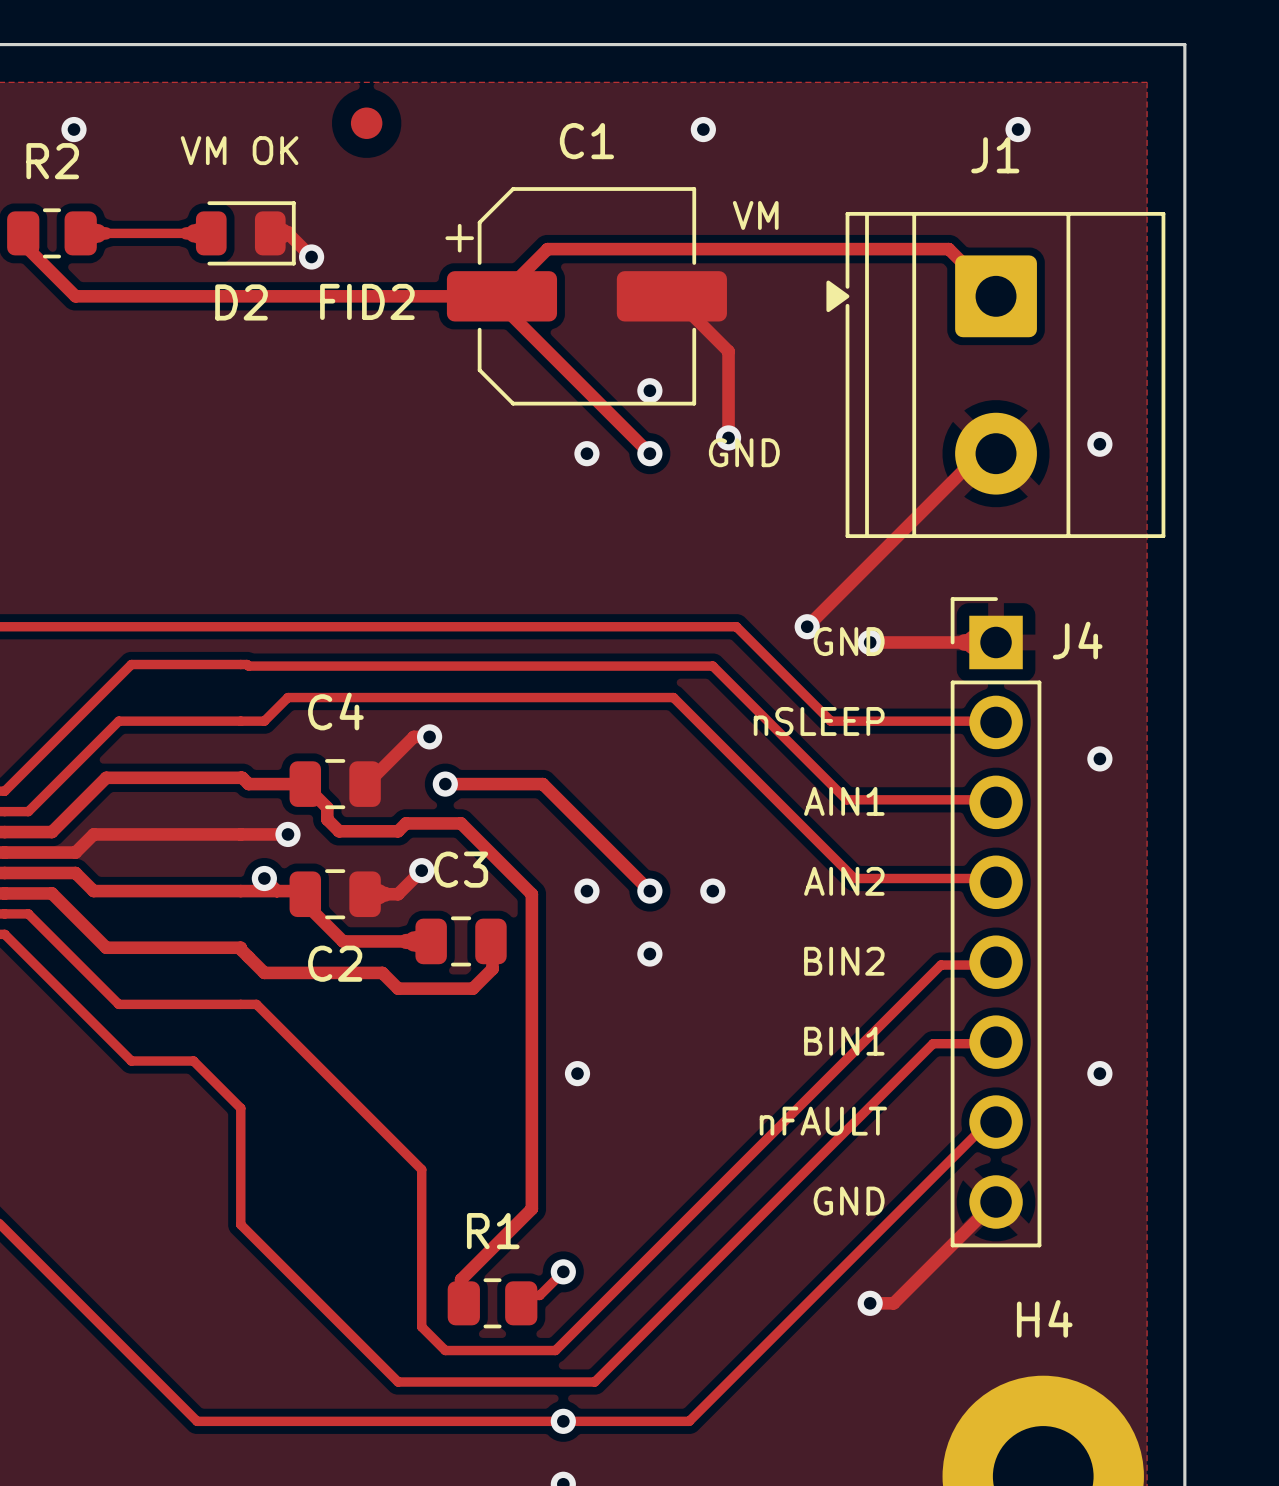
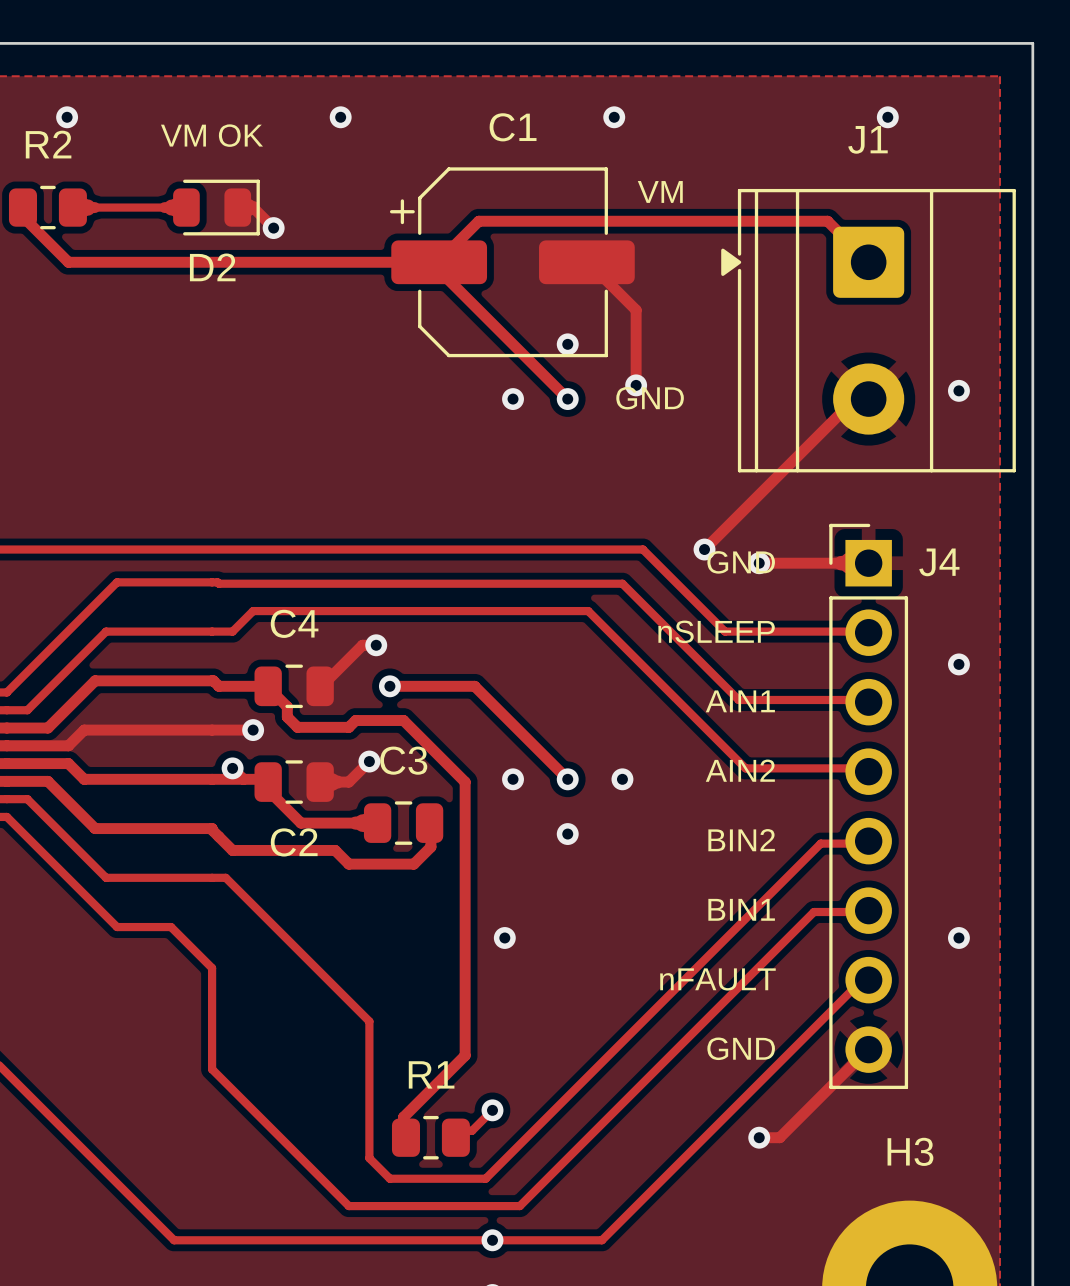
FID2: (366, 123) -> none
via: none -> (340, 117)
H4 name: H4 (1044, 1318) -> H3 (910, 1151)

